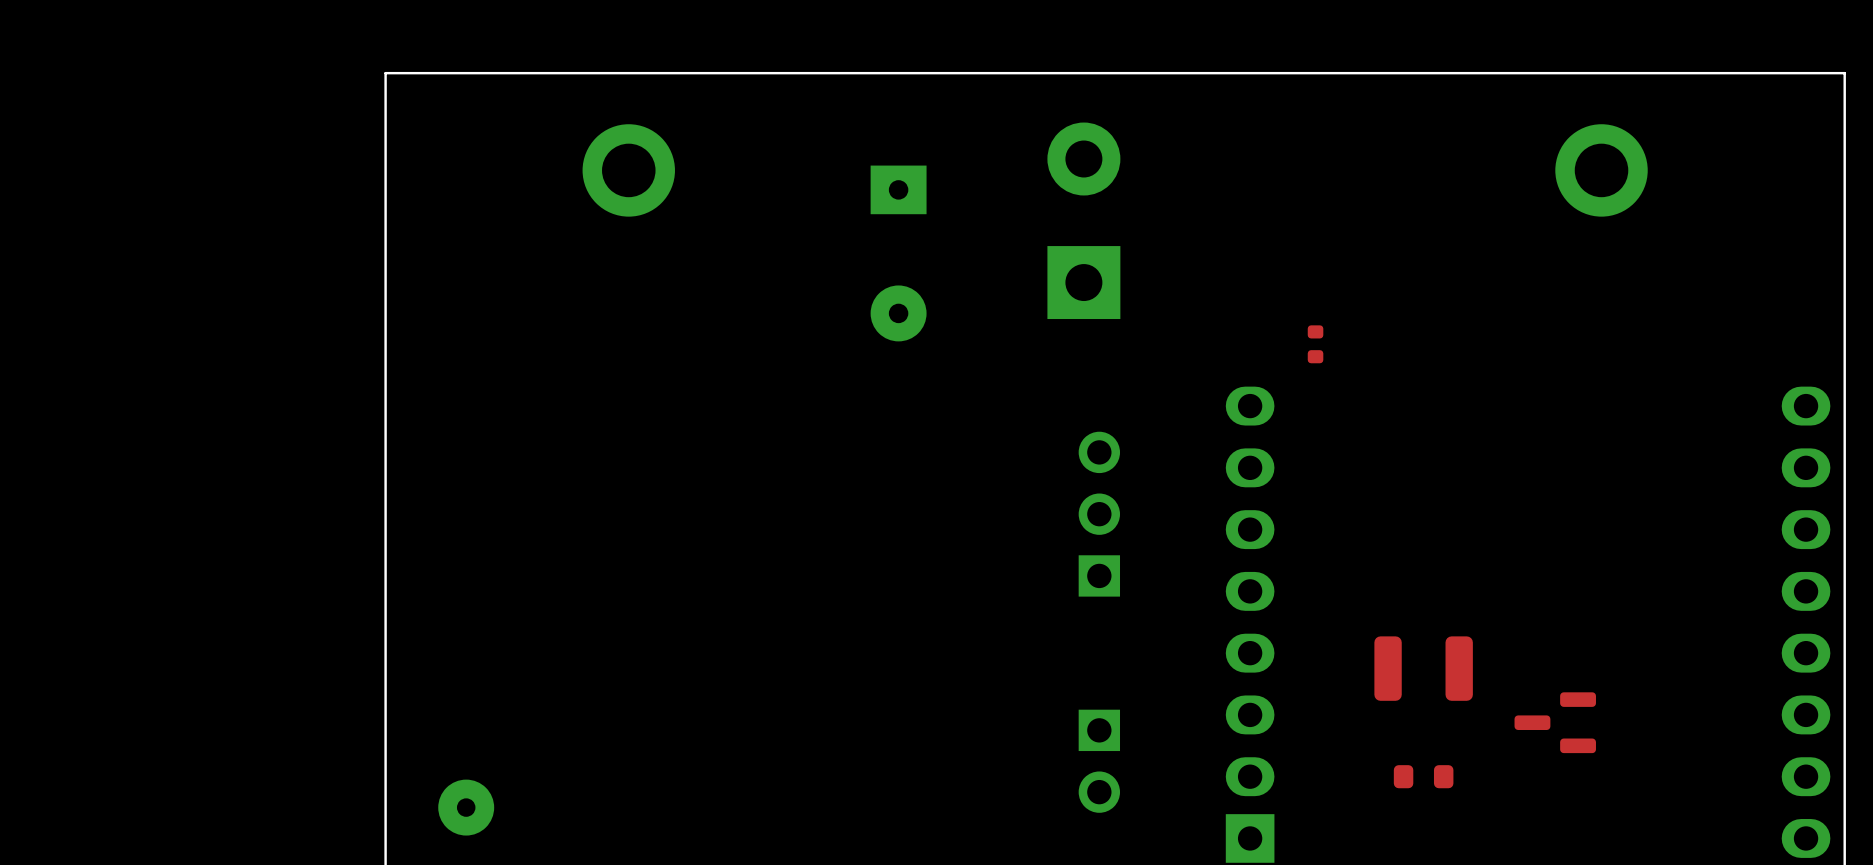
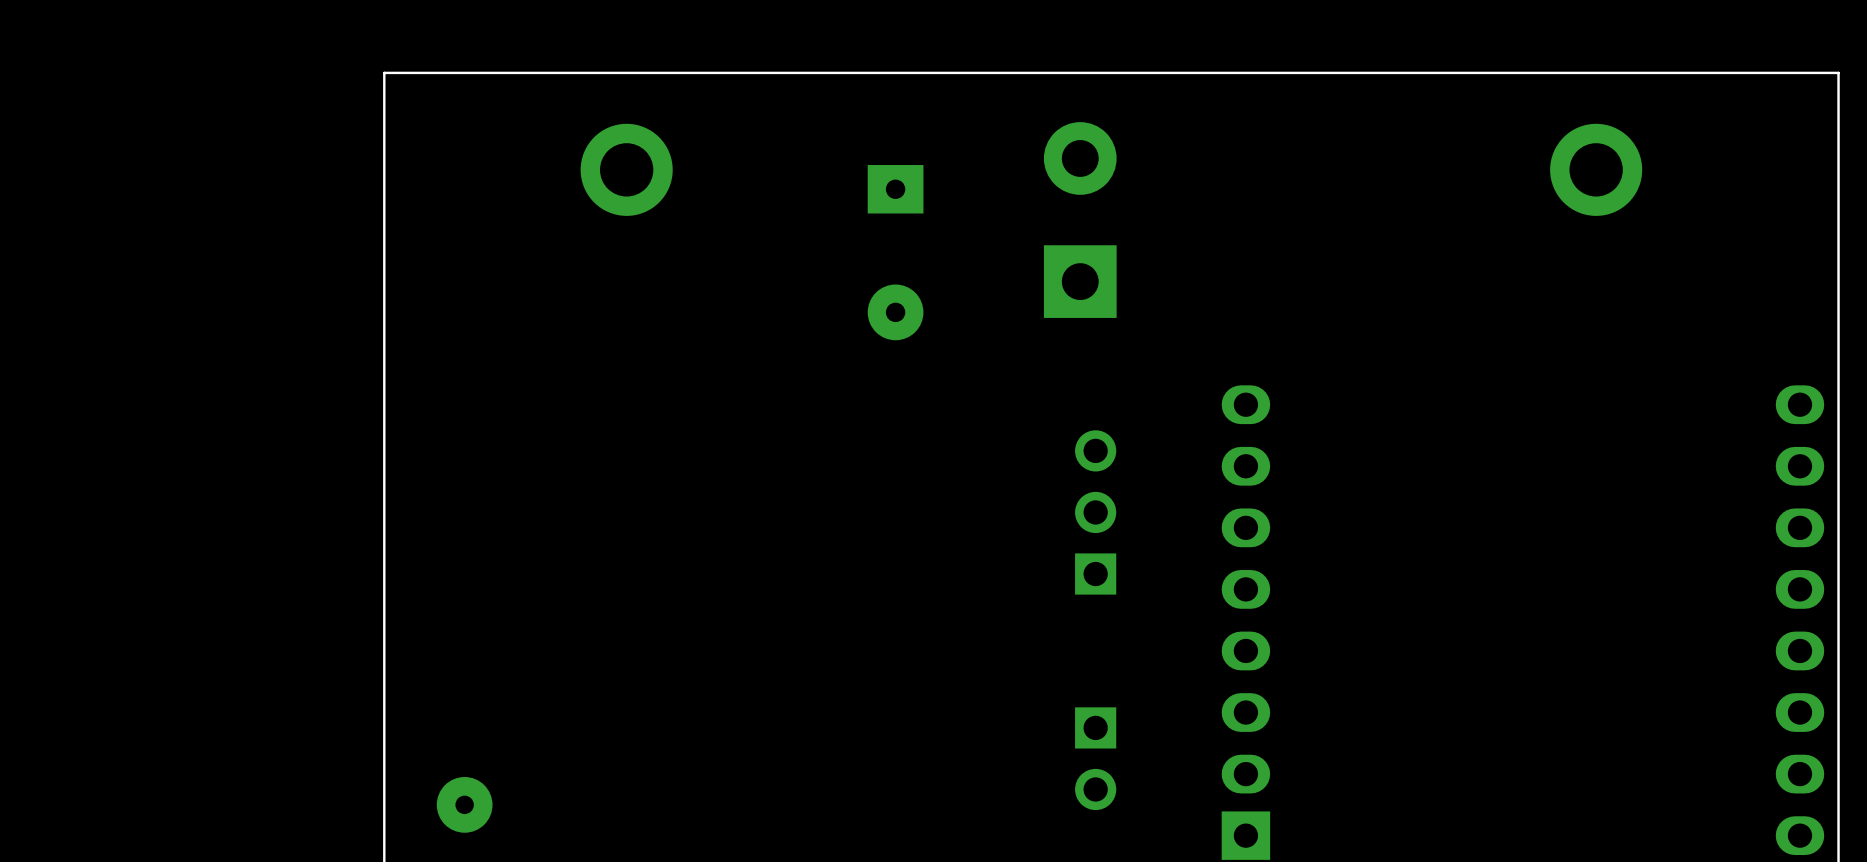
part: (1315, 344) -> none
part: (1423, 668) -> none
part: (1555, 722) -> none
part: (1423, 776) -> none

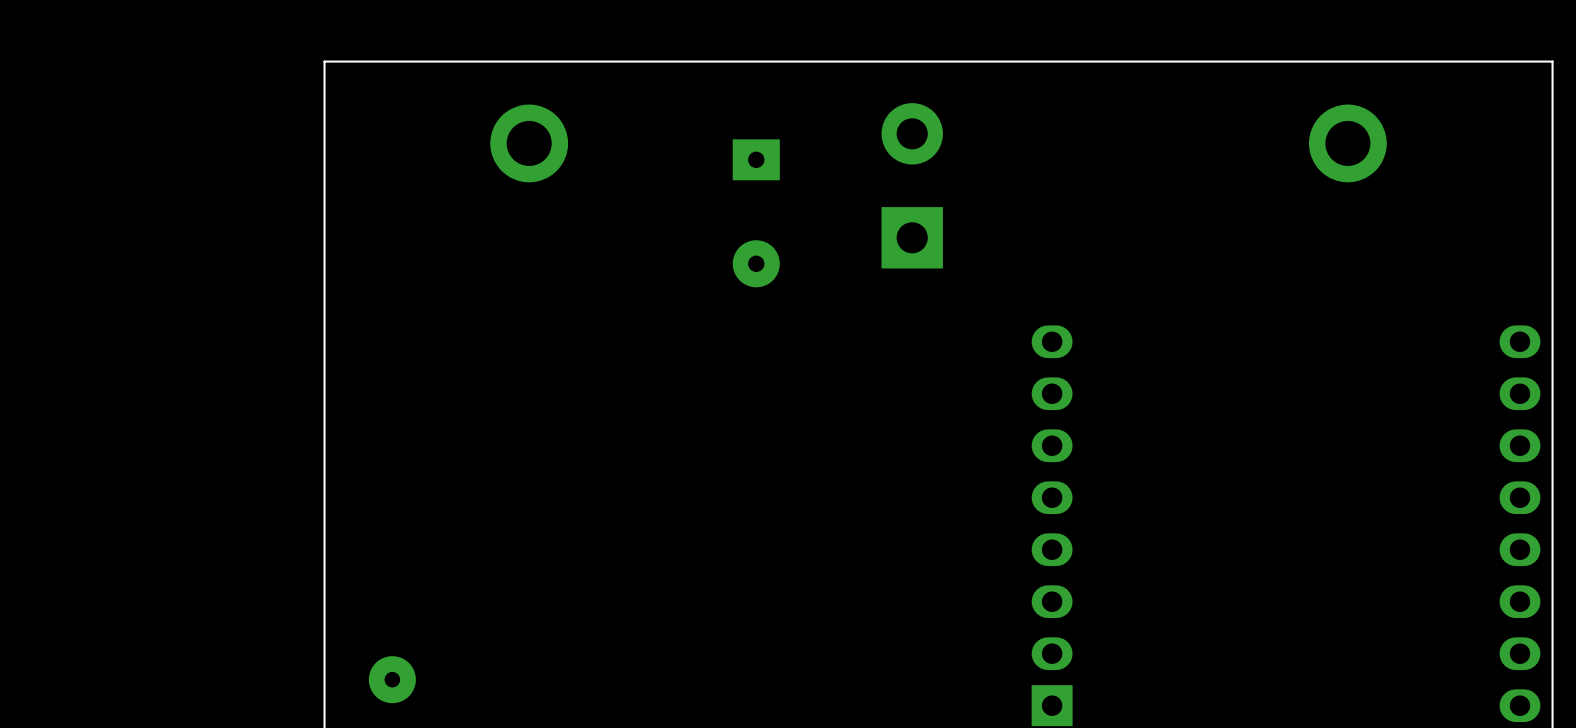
part: (1095, 512) -> none
part: (1095, 758) -> none

